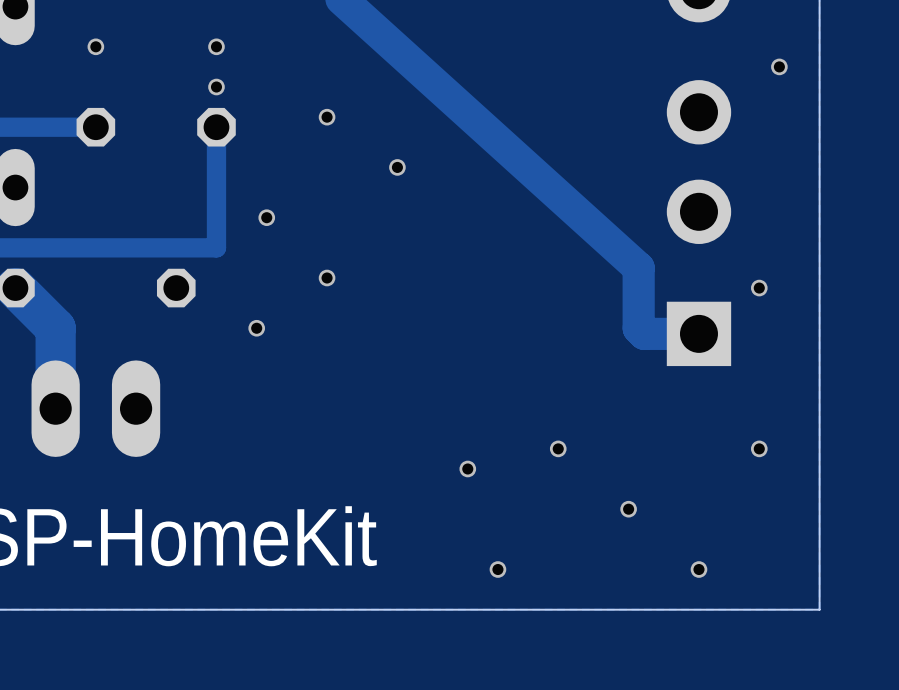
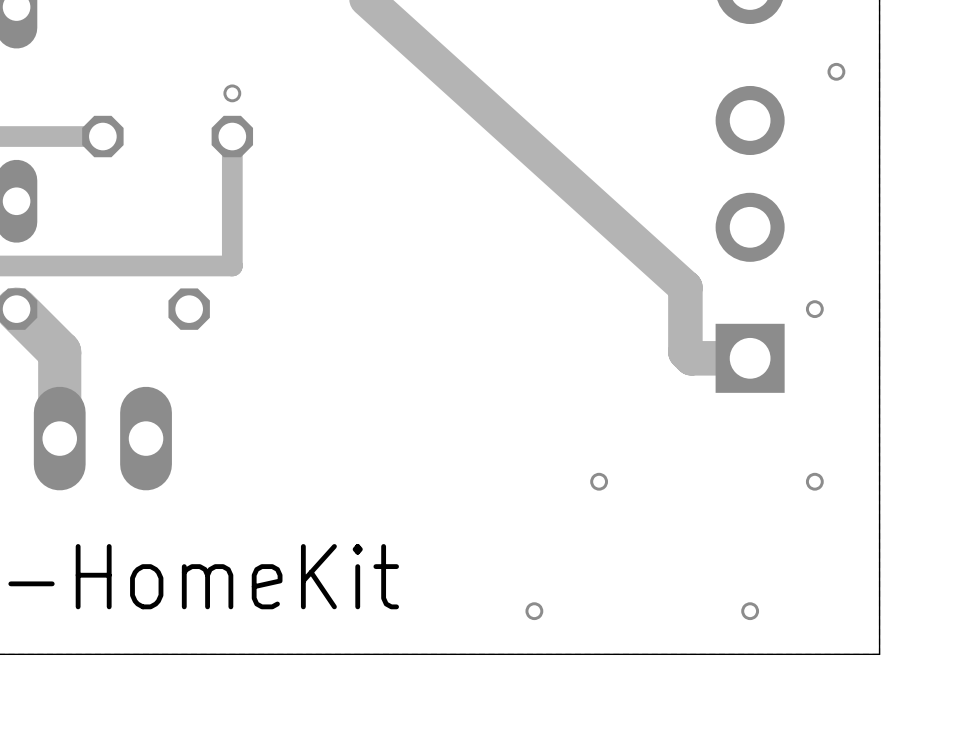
via: (95, 46) -> none
via: (216, 46) -> none
via: (327, 117) -> none
via: (397, 167) -> none
via: (266, 217) -> none
via: (327, 278) -> none
via: (256, 328) -> none
via: (467, 468) -> none
via: (628, 509) -> none

